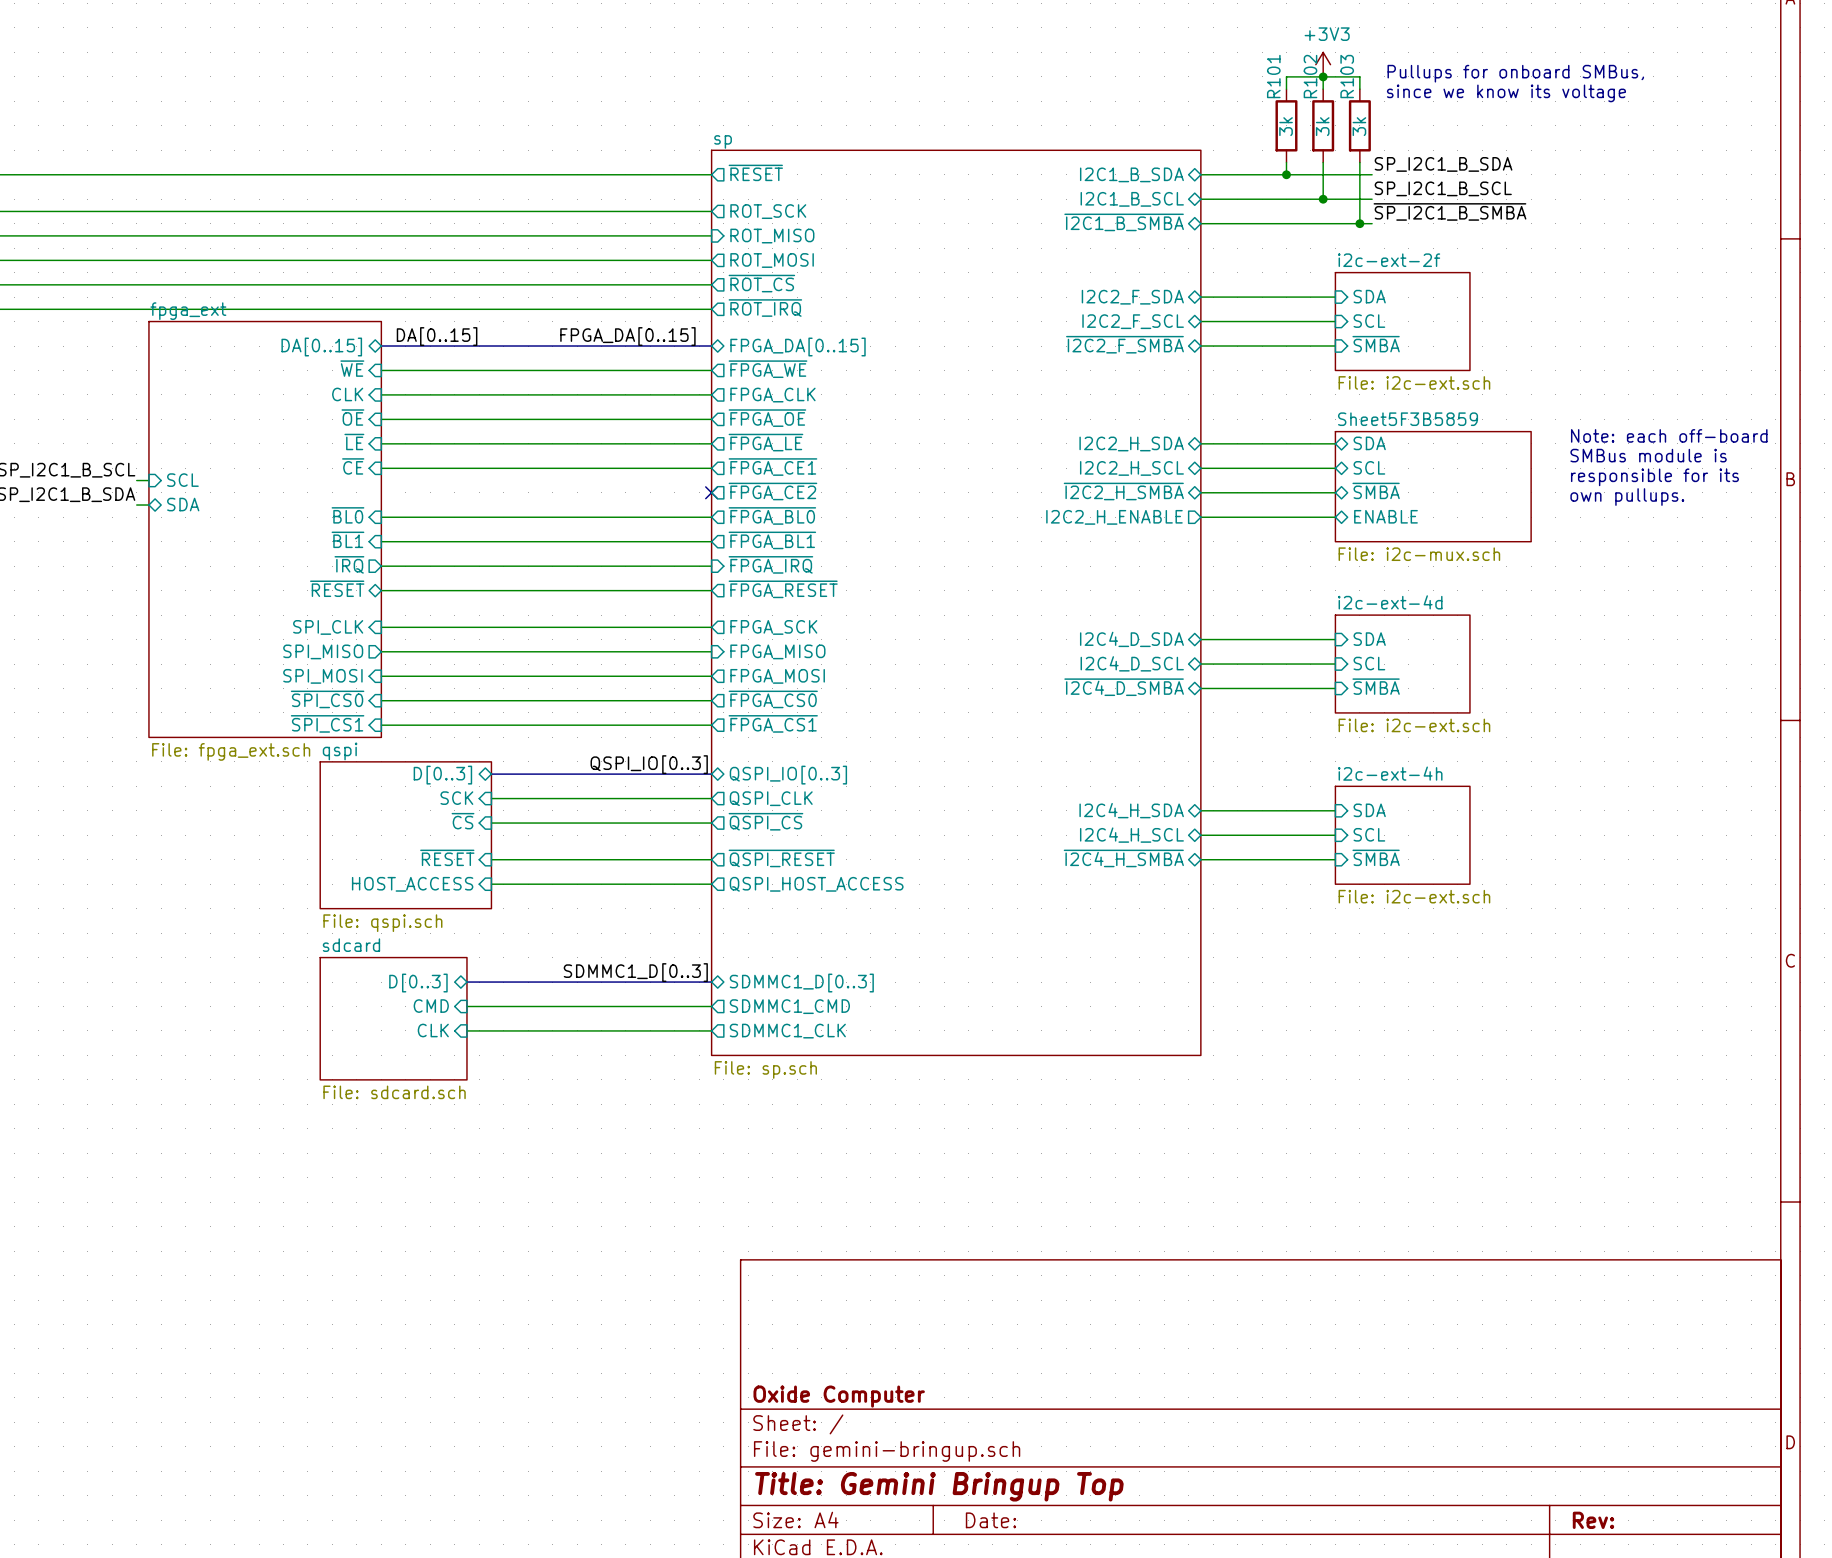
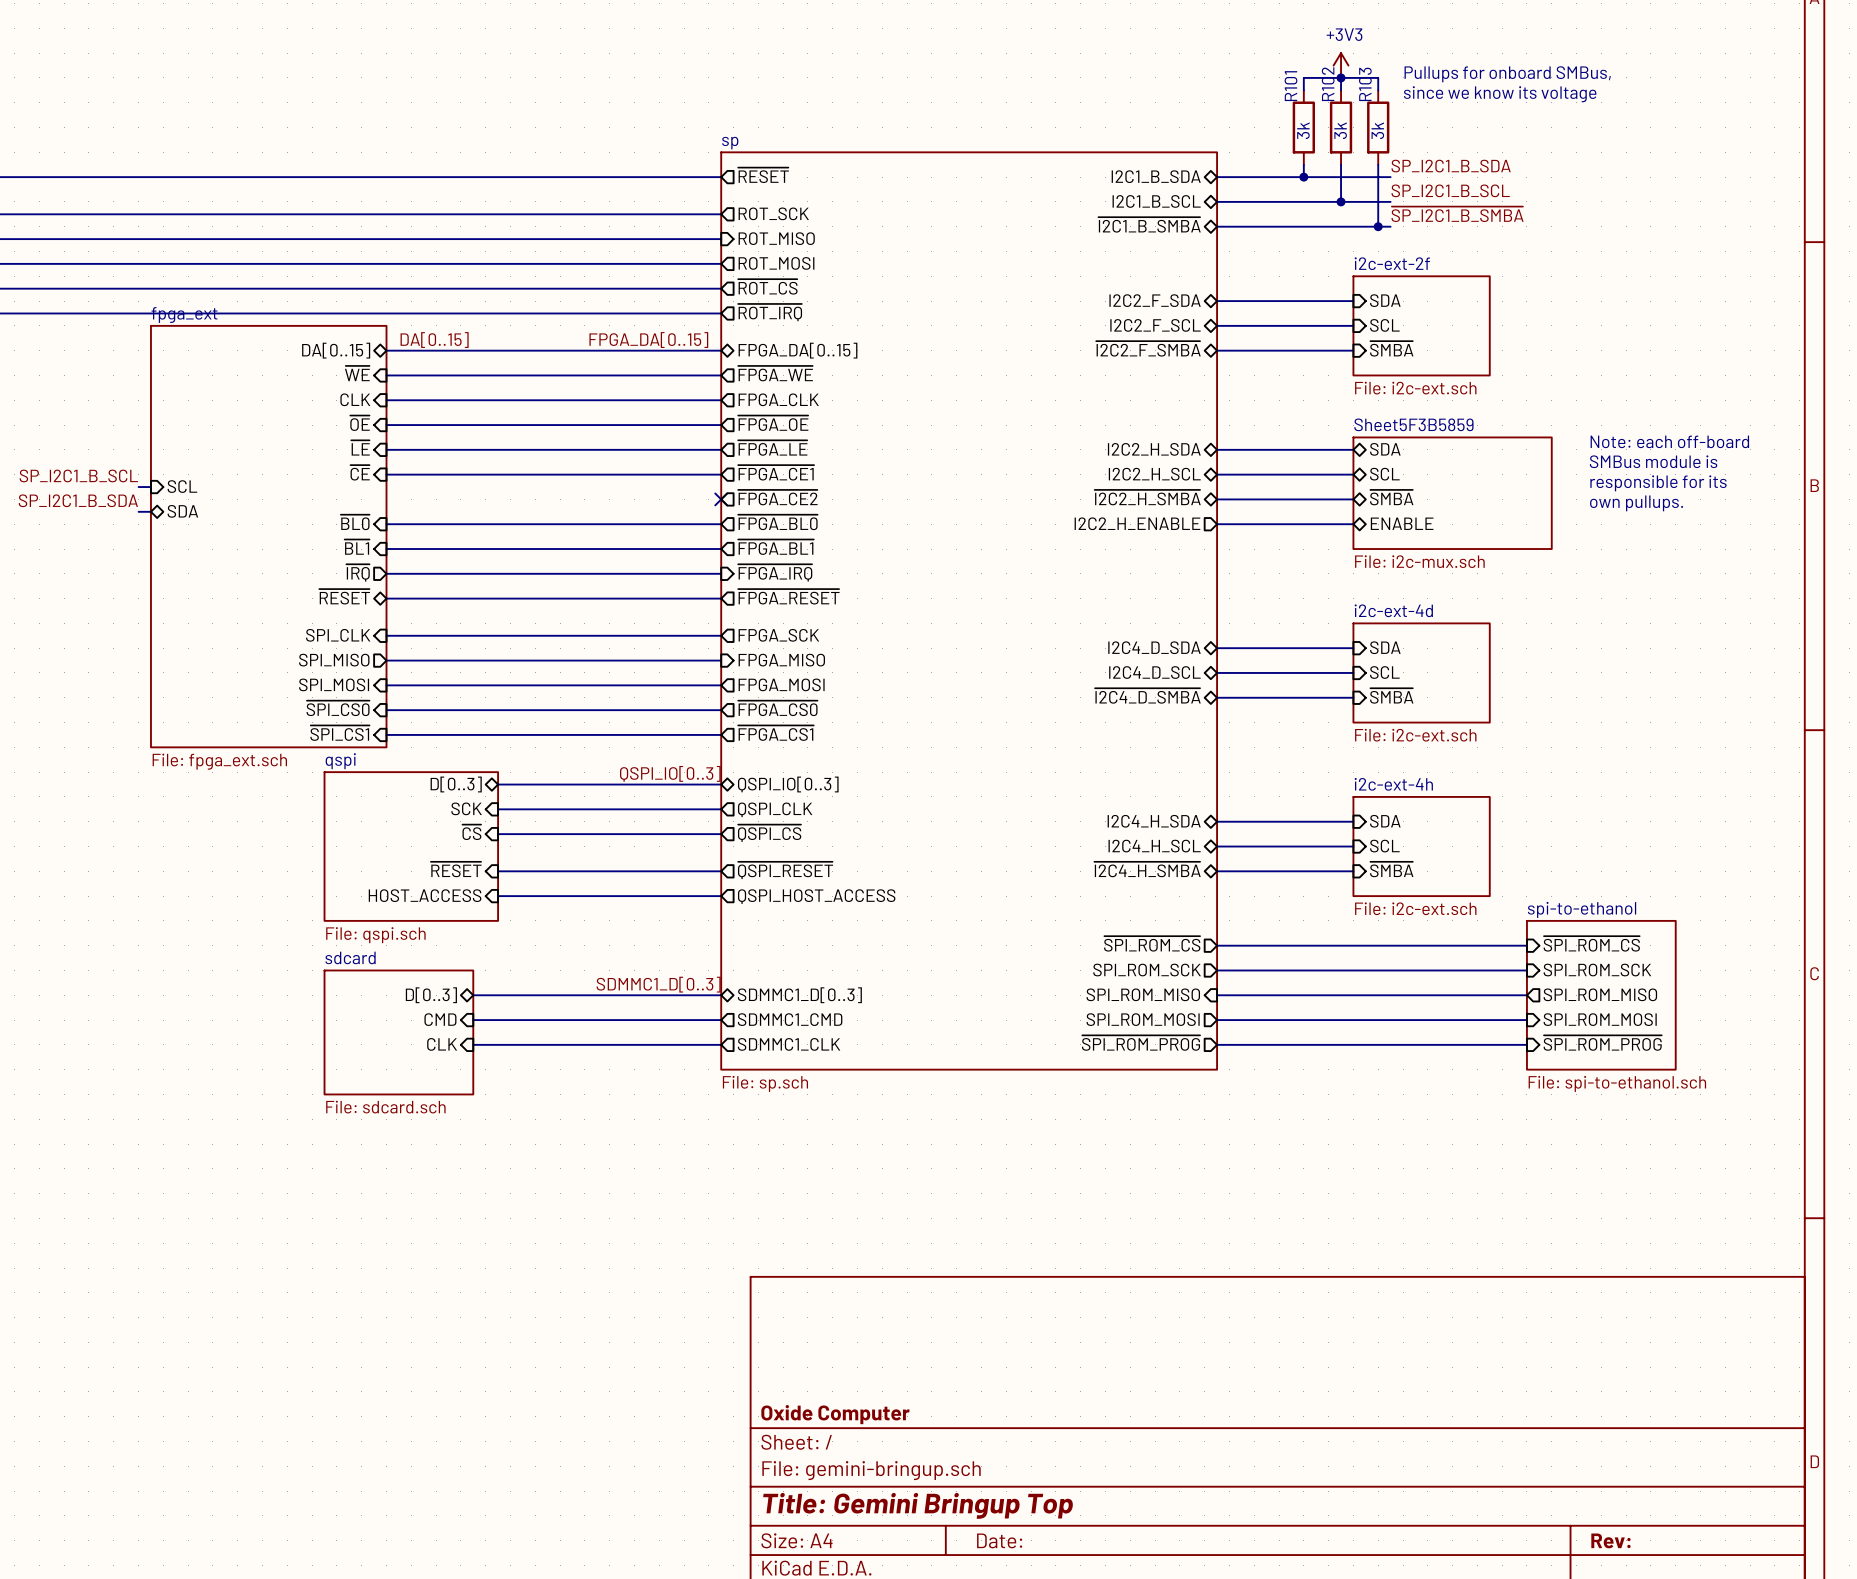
sheet pin: none -> ~{SPI_ROM_CS} (1152, 943)
sheet pin: none -> ~{SPI_ROM_CS} (1591, 943)
wire: none -> (1217, 945) (1526, 945)
sheet pin: none -> SPI_ROM_SCK (1147, 970)
wire: none -> (1217, 970) (1526, 970)
sheet pin: none -> SPI_ROM_SCK (1597, 970)
sheet pin: none -> SPI_ROM_MISO (1143, 994)
wire: none -> (1217, 995) (1526, 995)
sheet spi-to-ethanol: none -> File: spi-to-ethanol.sch (1601, 995)
sheet pin: none -> SPI_ROM_MISO (1600, 994)
sheet pin: none -> SPI_ROM_MOSI (1143, 1019)
wire: none -> (1217, 1020) (1526, 1020)
sheet pin: none -> SPI_ROM_MOSI (1600, 1019)
sheet pin: none -> ~{SPI_ROM_PROG} (1141, 1043)
sheet pin: none -> ~{SPI_ROM_PROG} (1602, 1043)
wire: none -> (1217, 1044) (1526, 1044)

